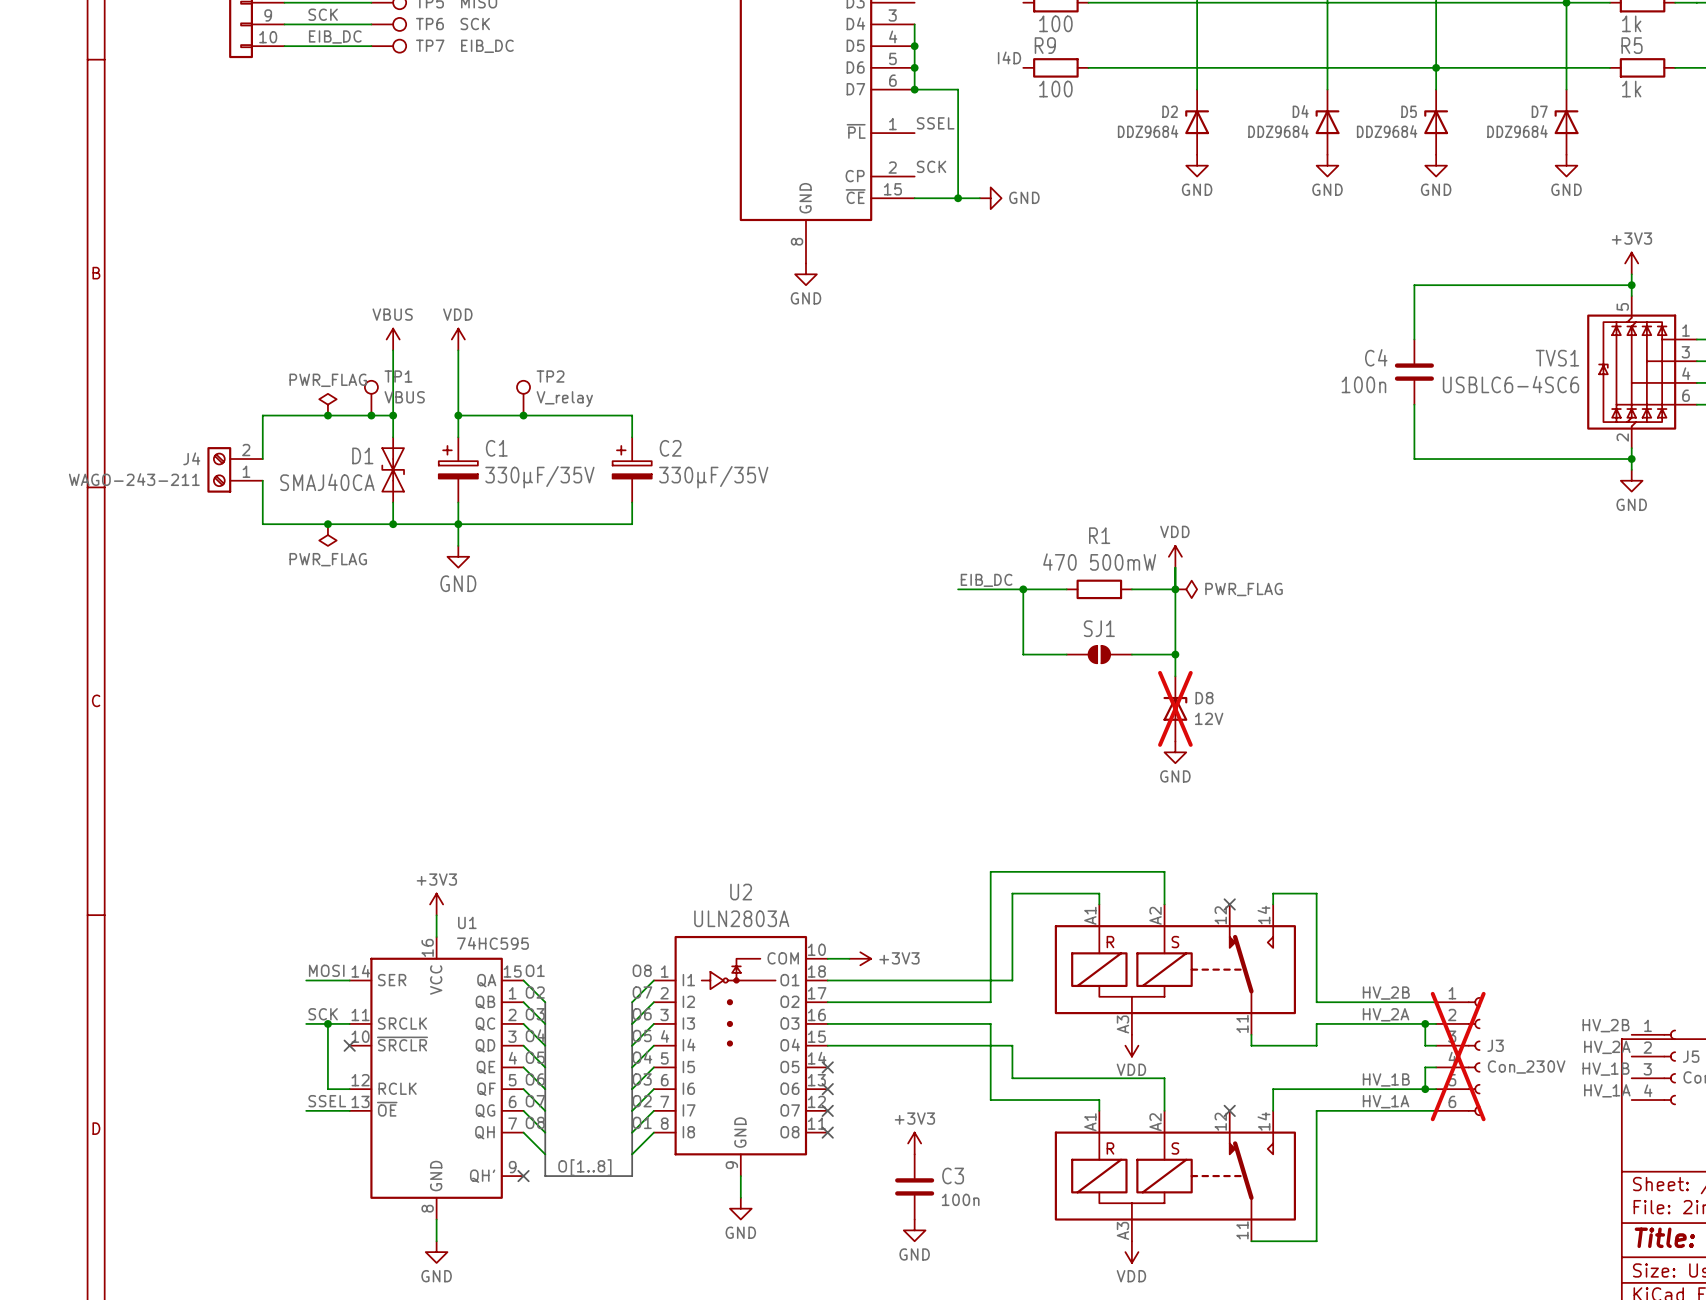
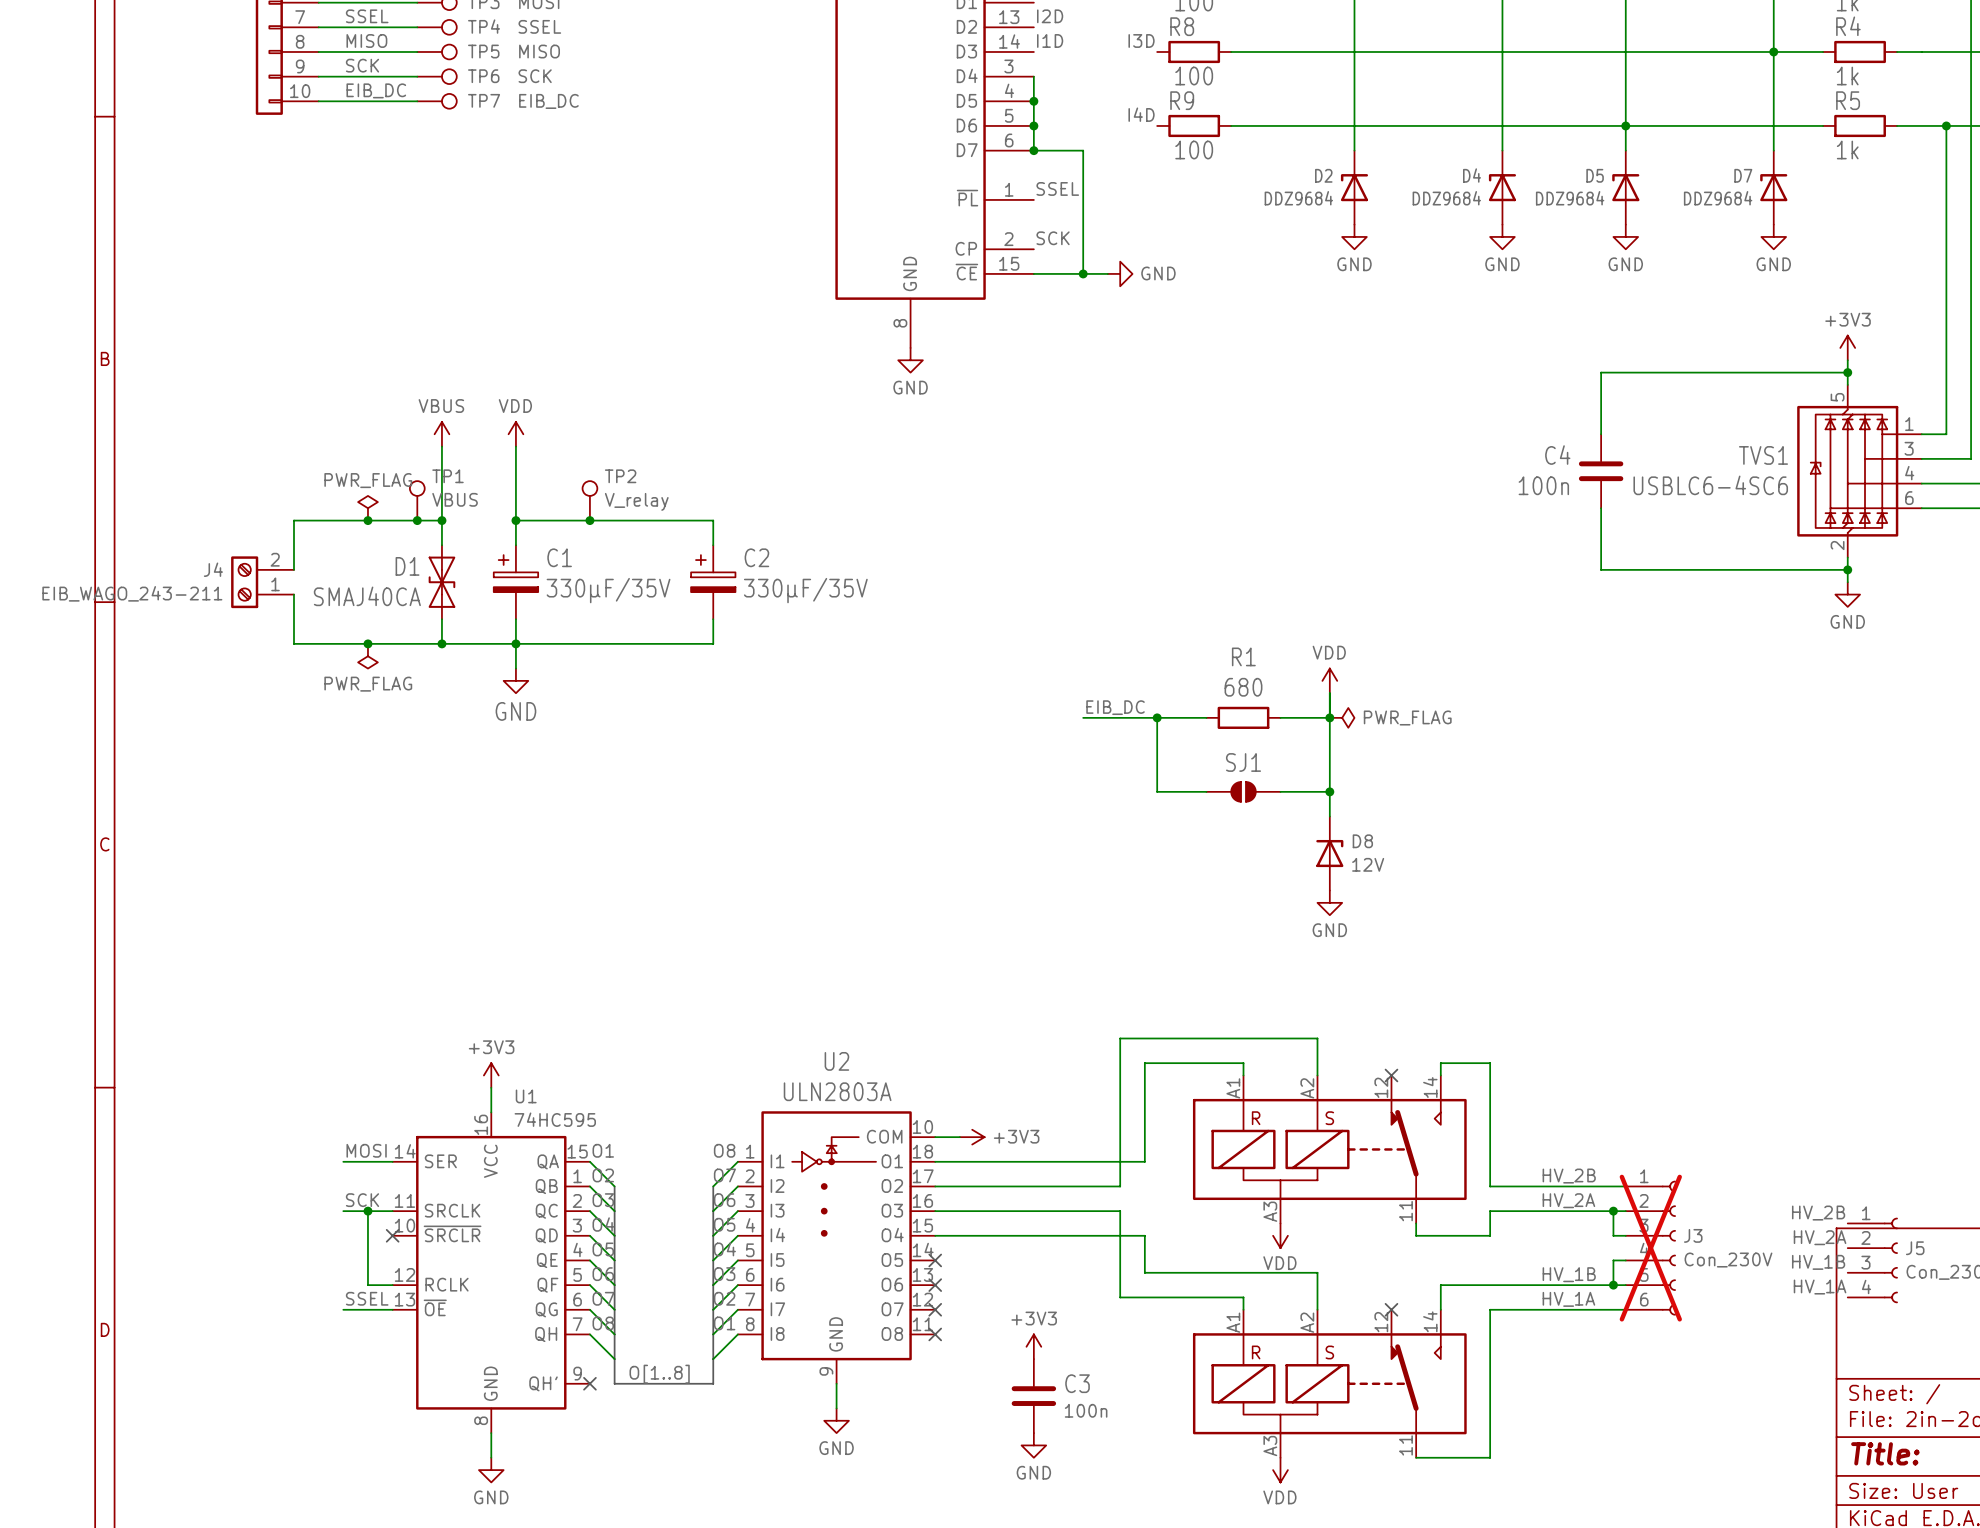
J4 value: WAGO-243-211 (134, 479) -> EIB_WAGO_243-211 (132, 593)
R1 value: 470 500mW (1099, 562) -> 680 (1243, 687)
D8 do-not-place cross: (1175, 708) -> none

